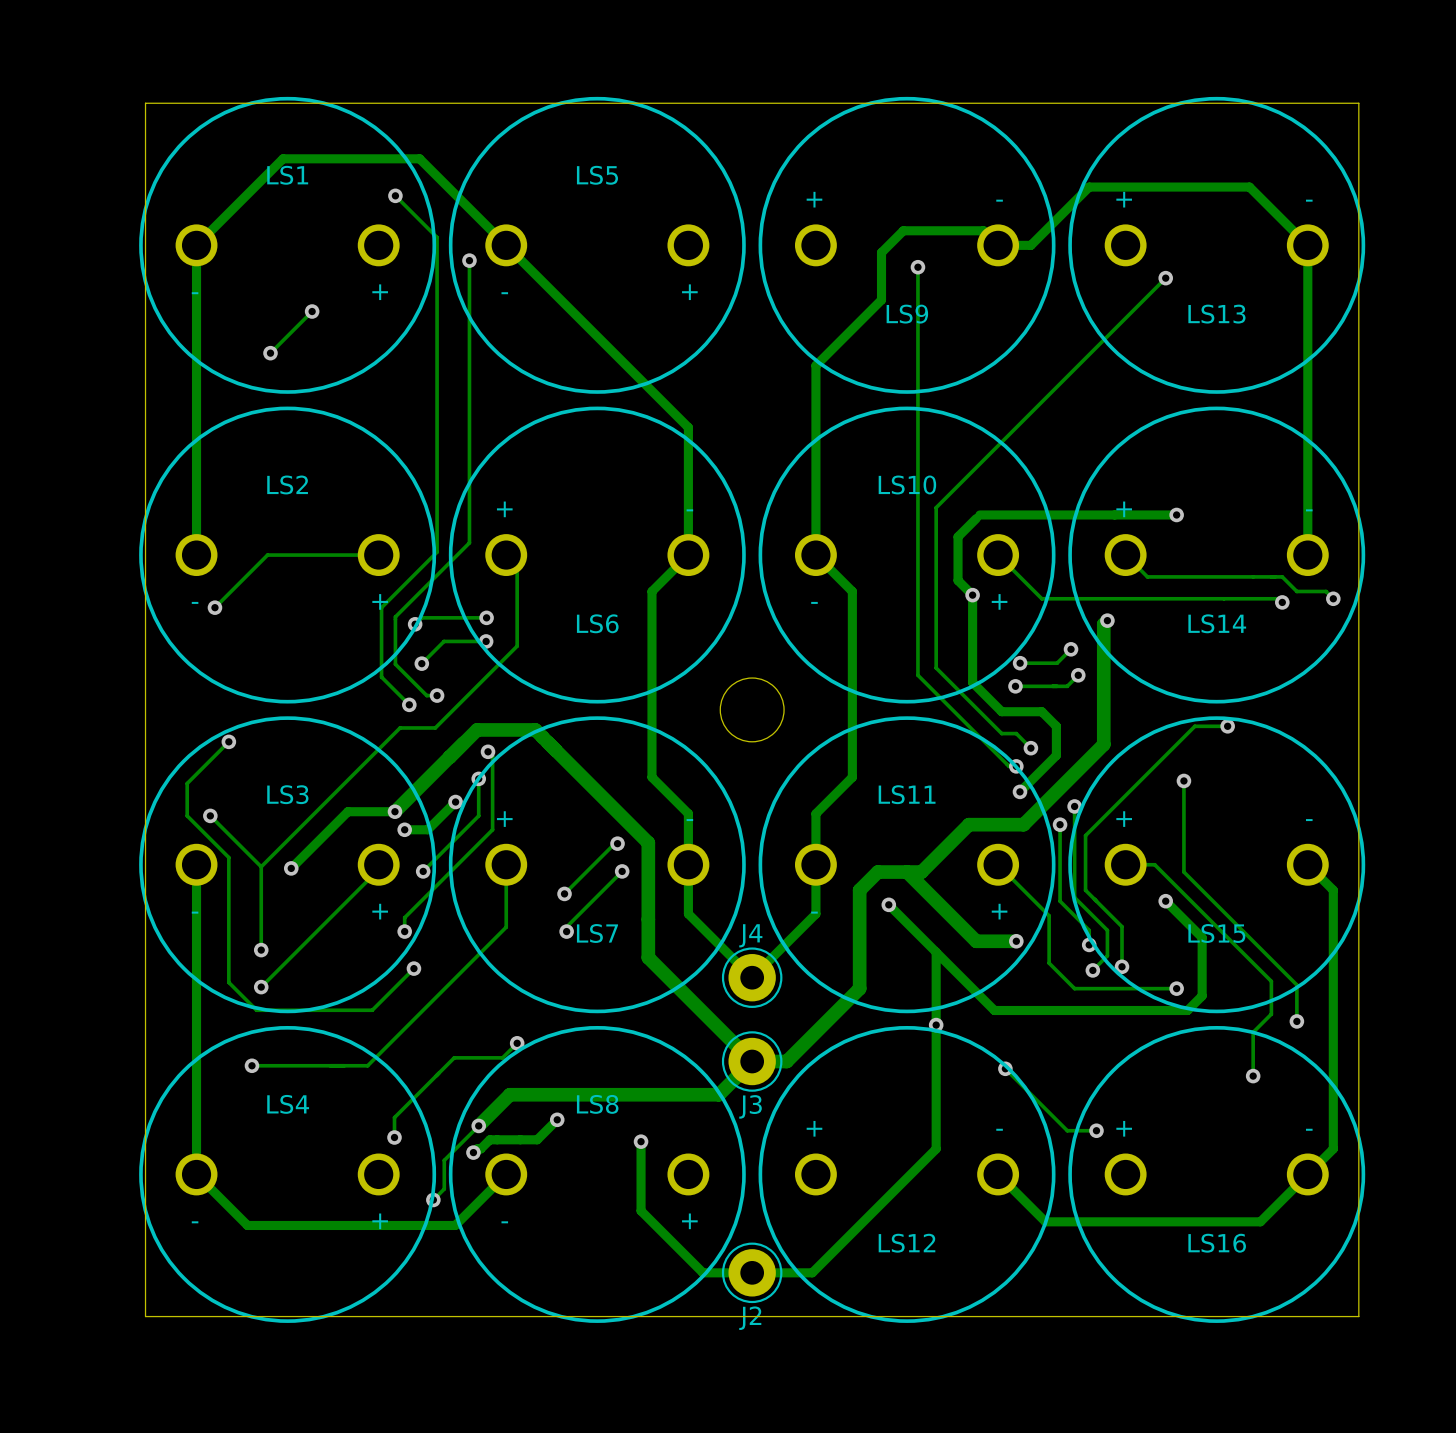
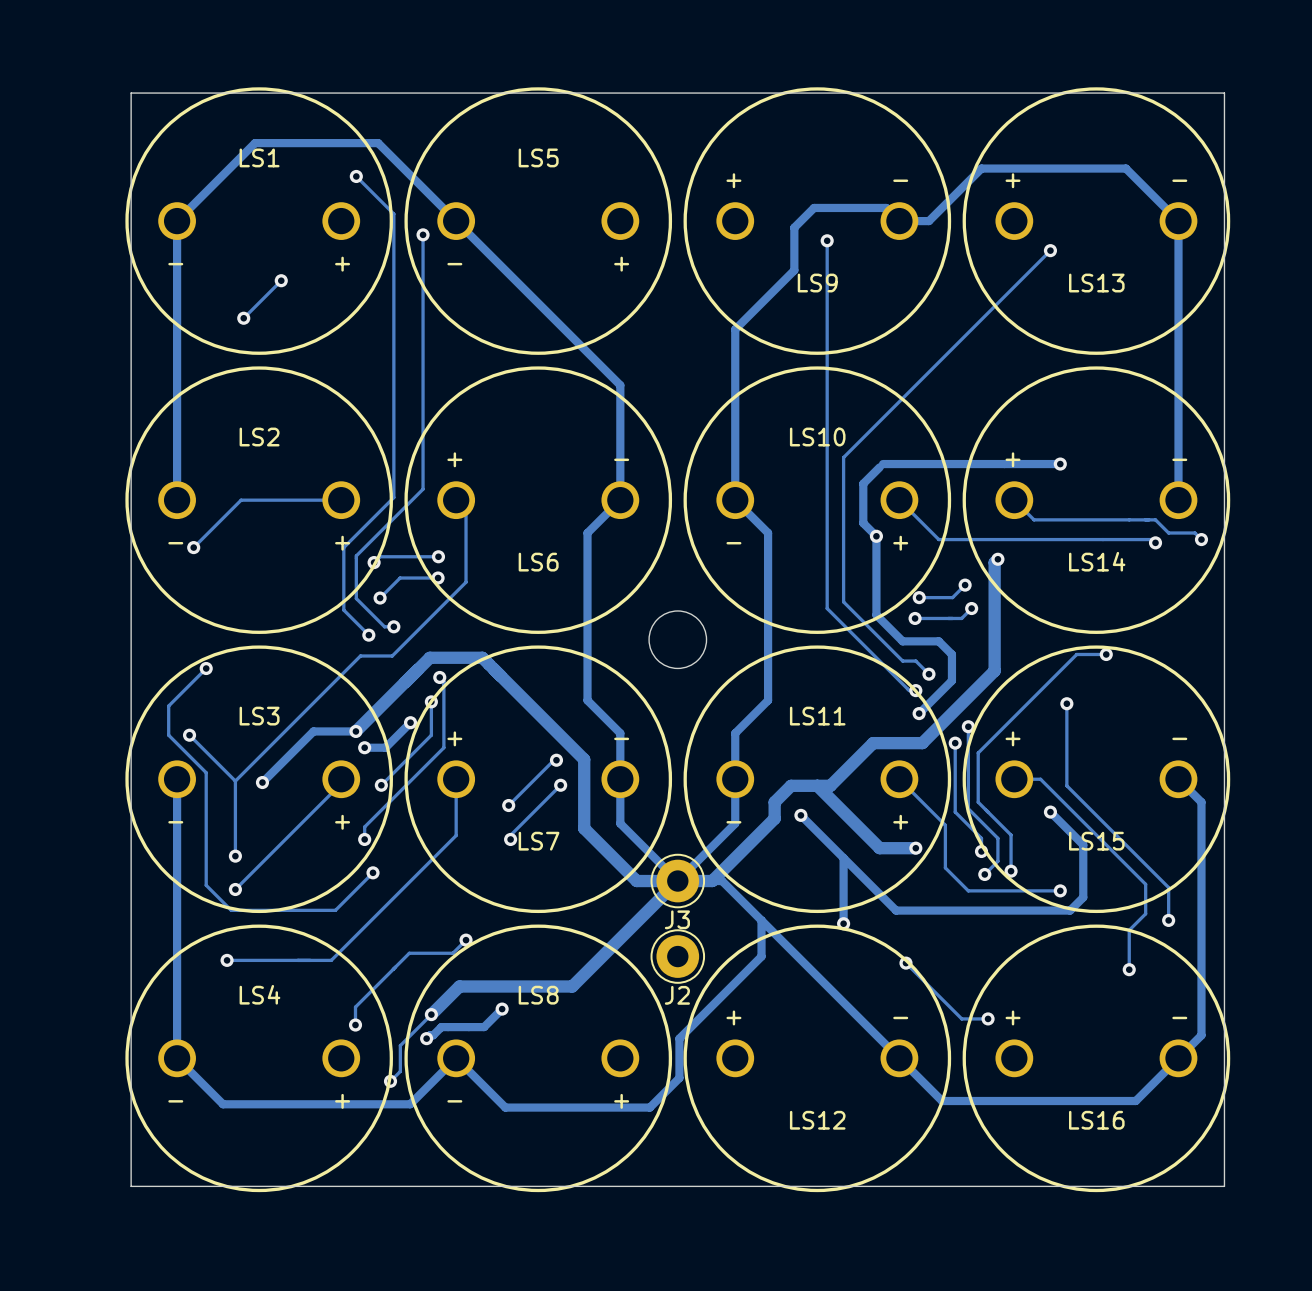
track: (859, 908) (859, 988) (786, 1061) (764, 1061) -> (774, 818) (712, 881) (636, 881) (584, 828)
track: (648, 919) (648, 957) (752, 1061) (718, 1094) (635, 1094) -> (899, 1058) (722, 881) (677, 881) (572, 986)
J4 name: J4 (750, 935) -> J3 (677, 919)
track: none -> (761, 920) (761, 956) (679, 1038) (679, 1078) (649, 1107) (505, 1107) (456, 1058)
track: (936, 1025) (936, 1148) (812, 1272) (702, 1272) (641, 1210) (641, 1141) -> none
J3 name: J3 (750, 1106) -> J2 (677, 995)
via: (641, 1141) -> none
J2: (752, 1272) -> none

